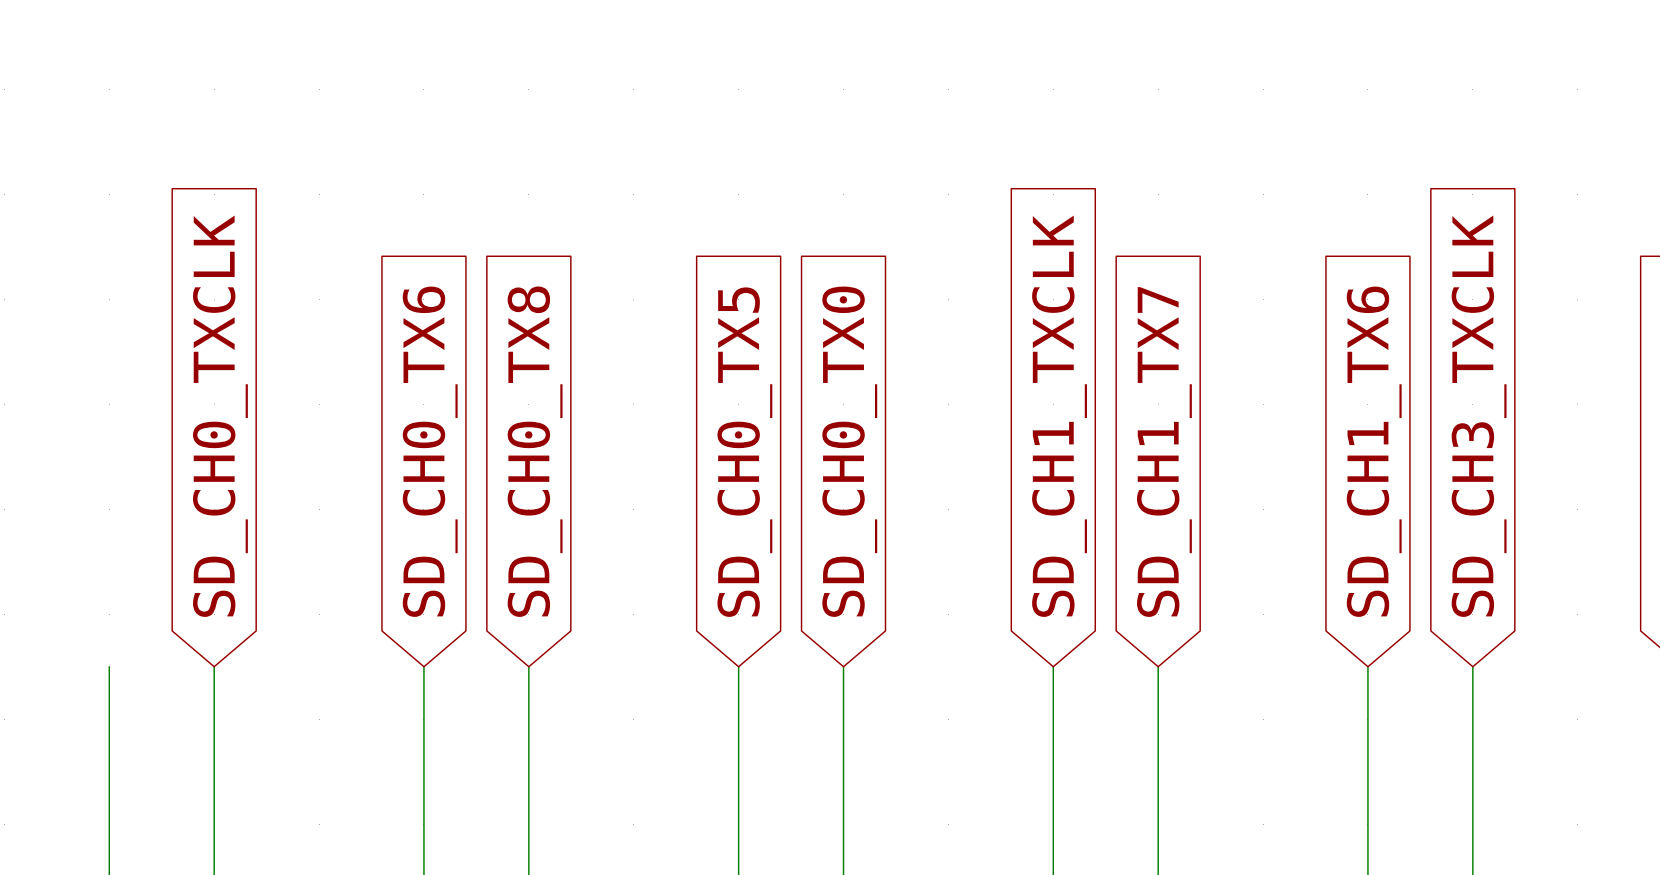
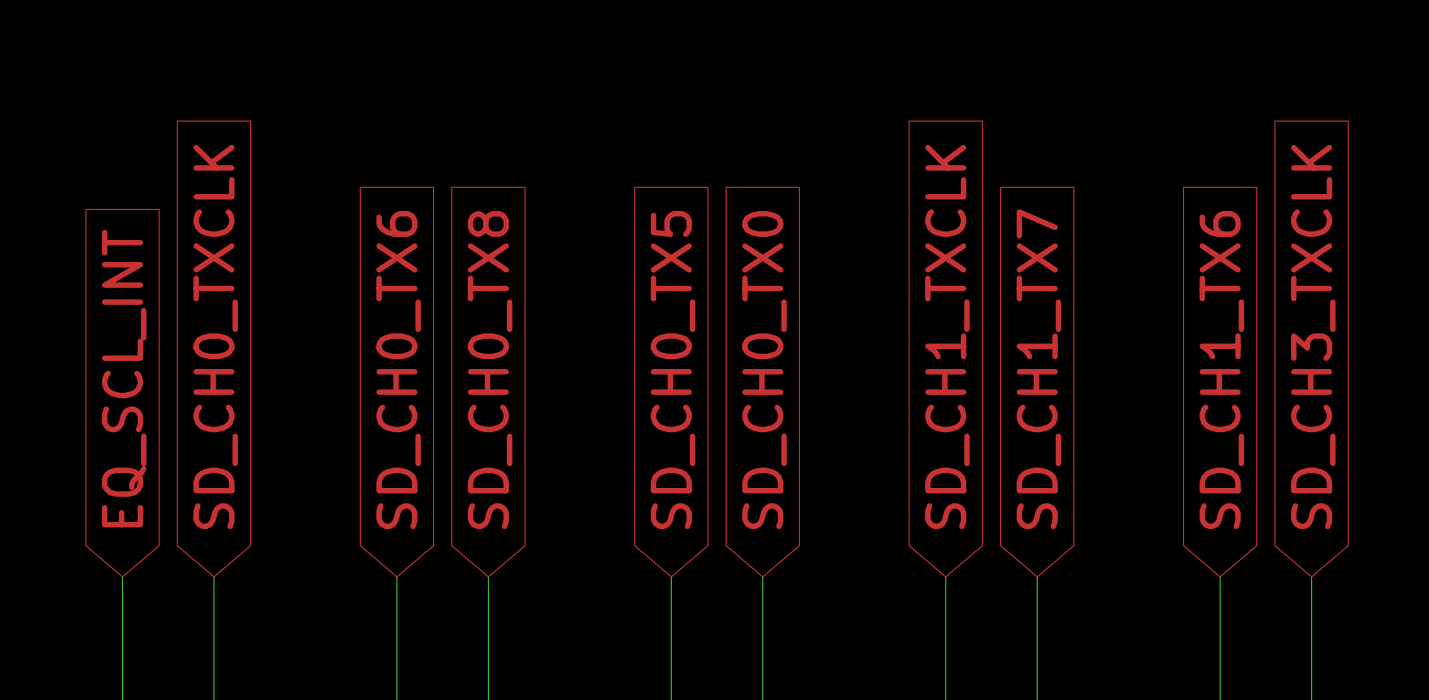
global label: none -> EQ_SCL_INT (124, 378)

